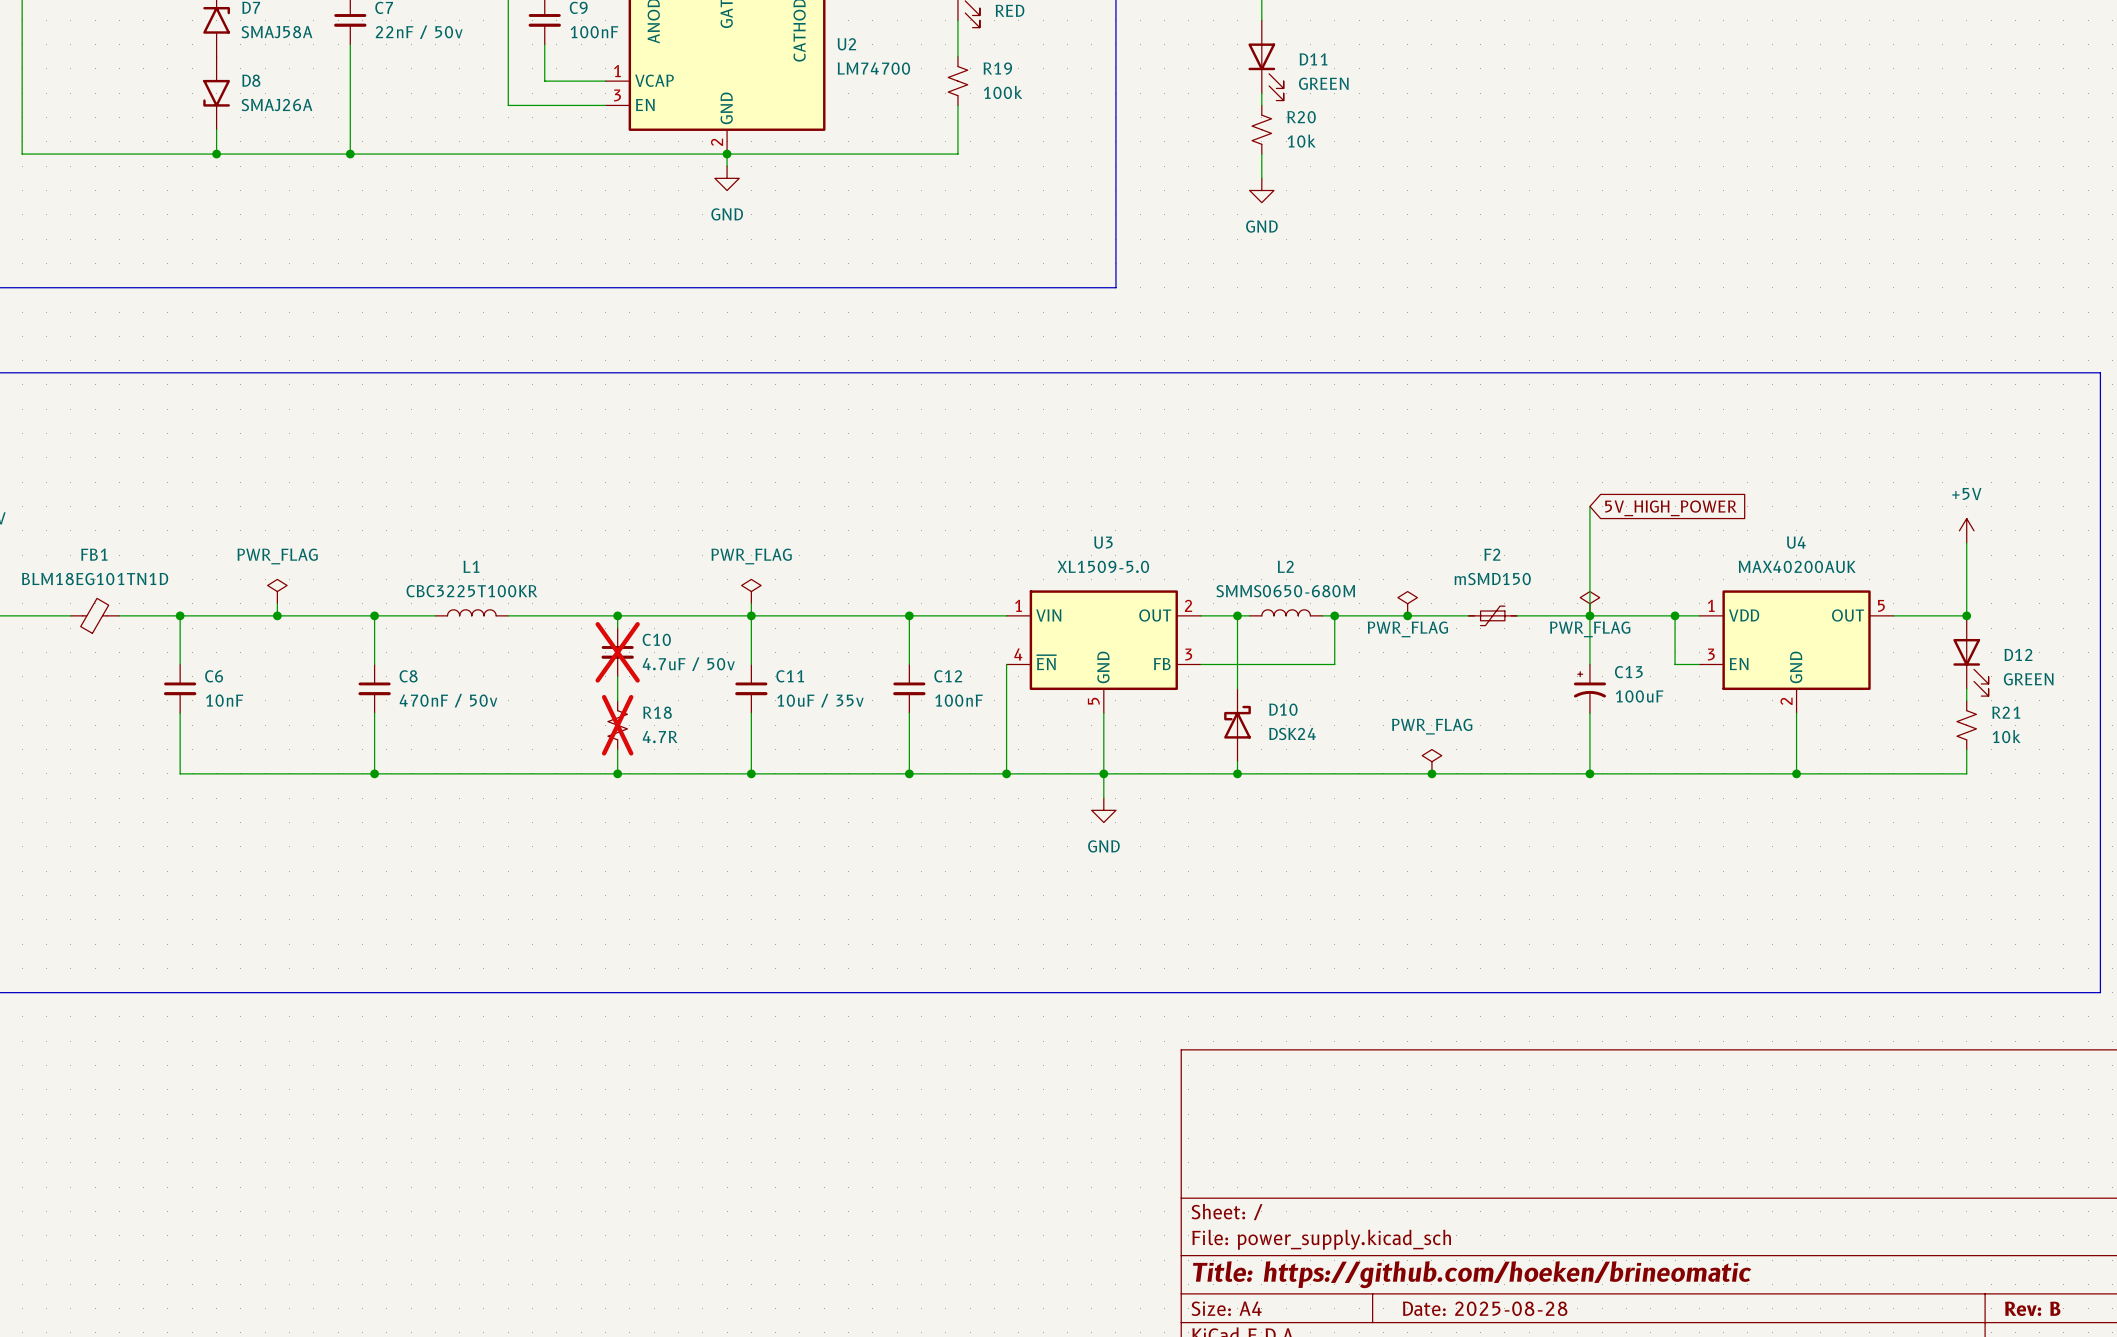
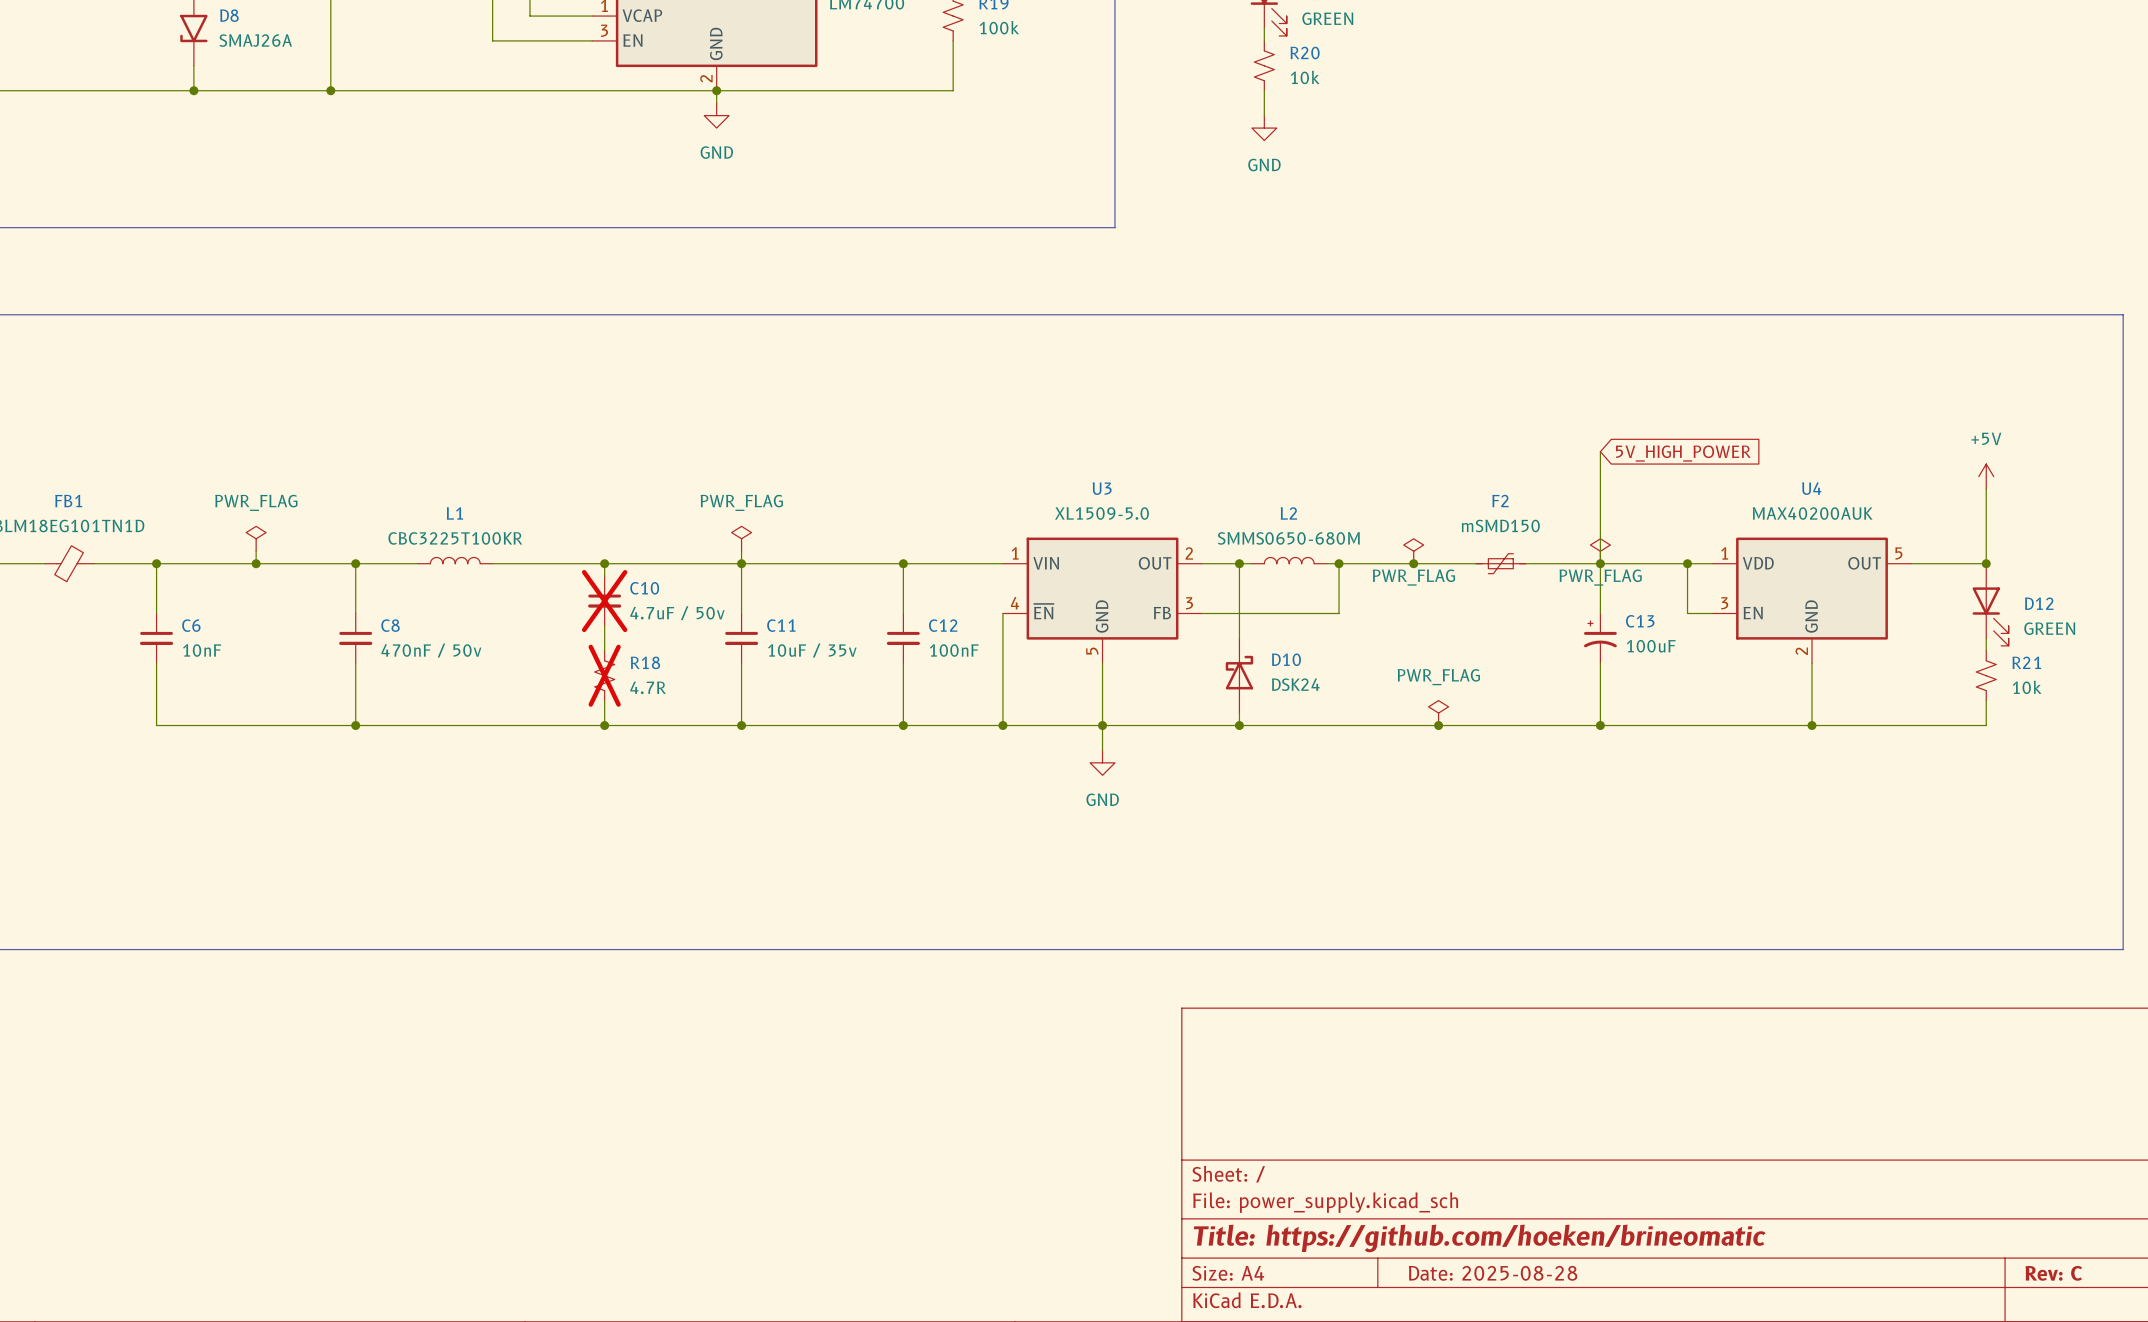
title block: Rev: B (2032, 1308) -> Rev: C (2053, 1273)

